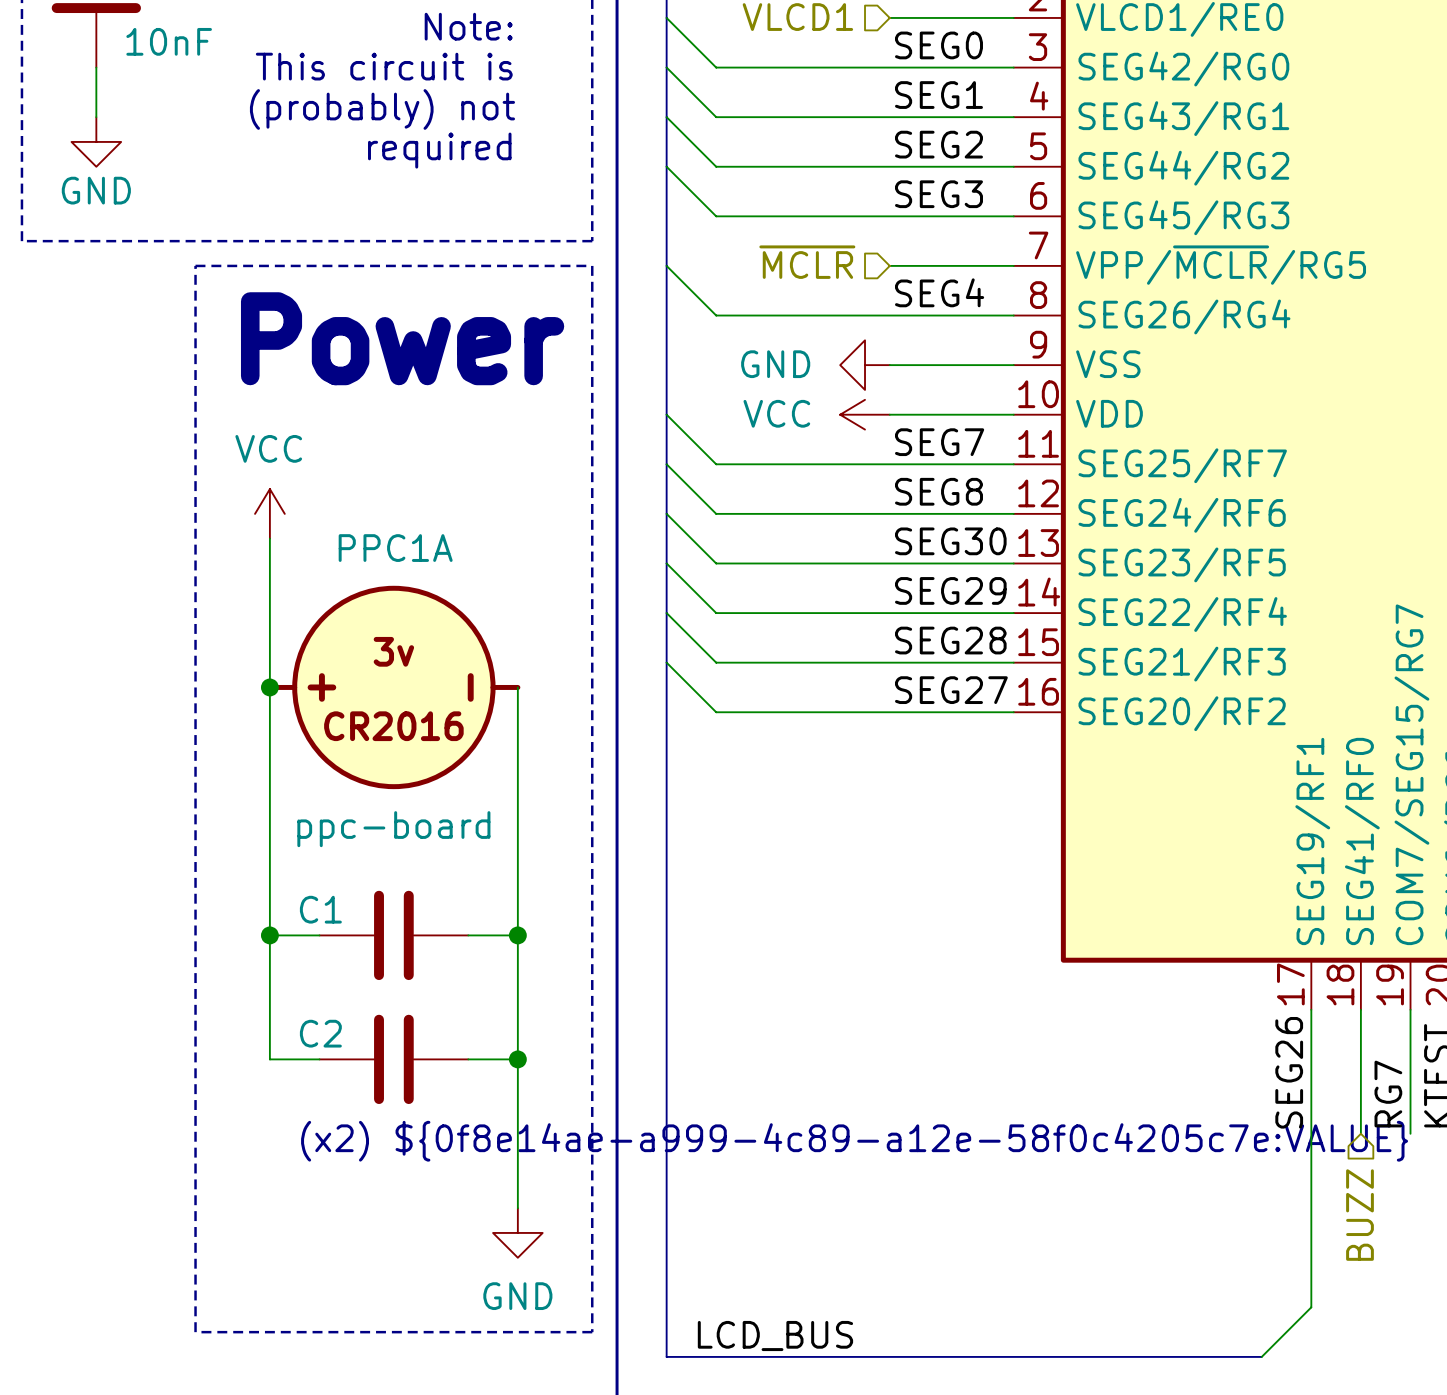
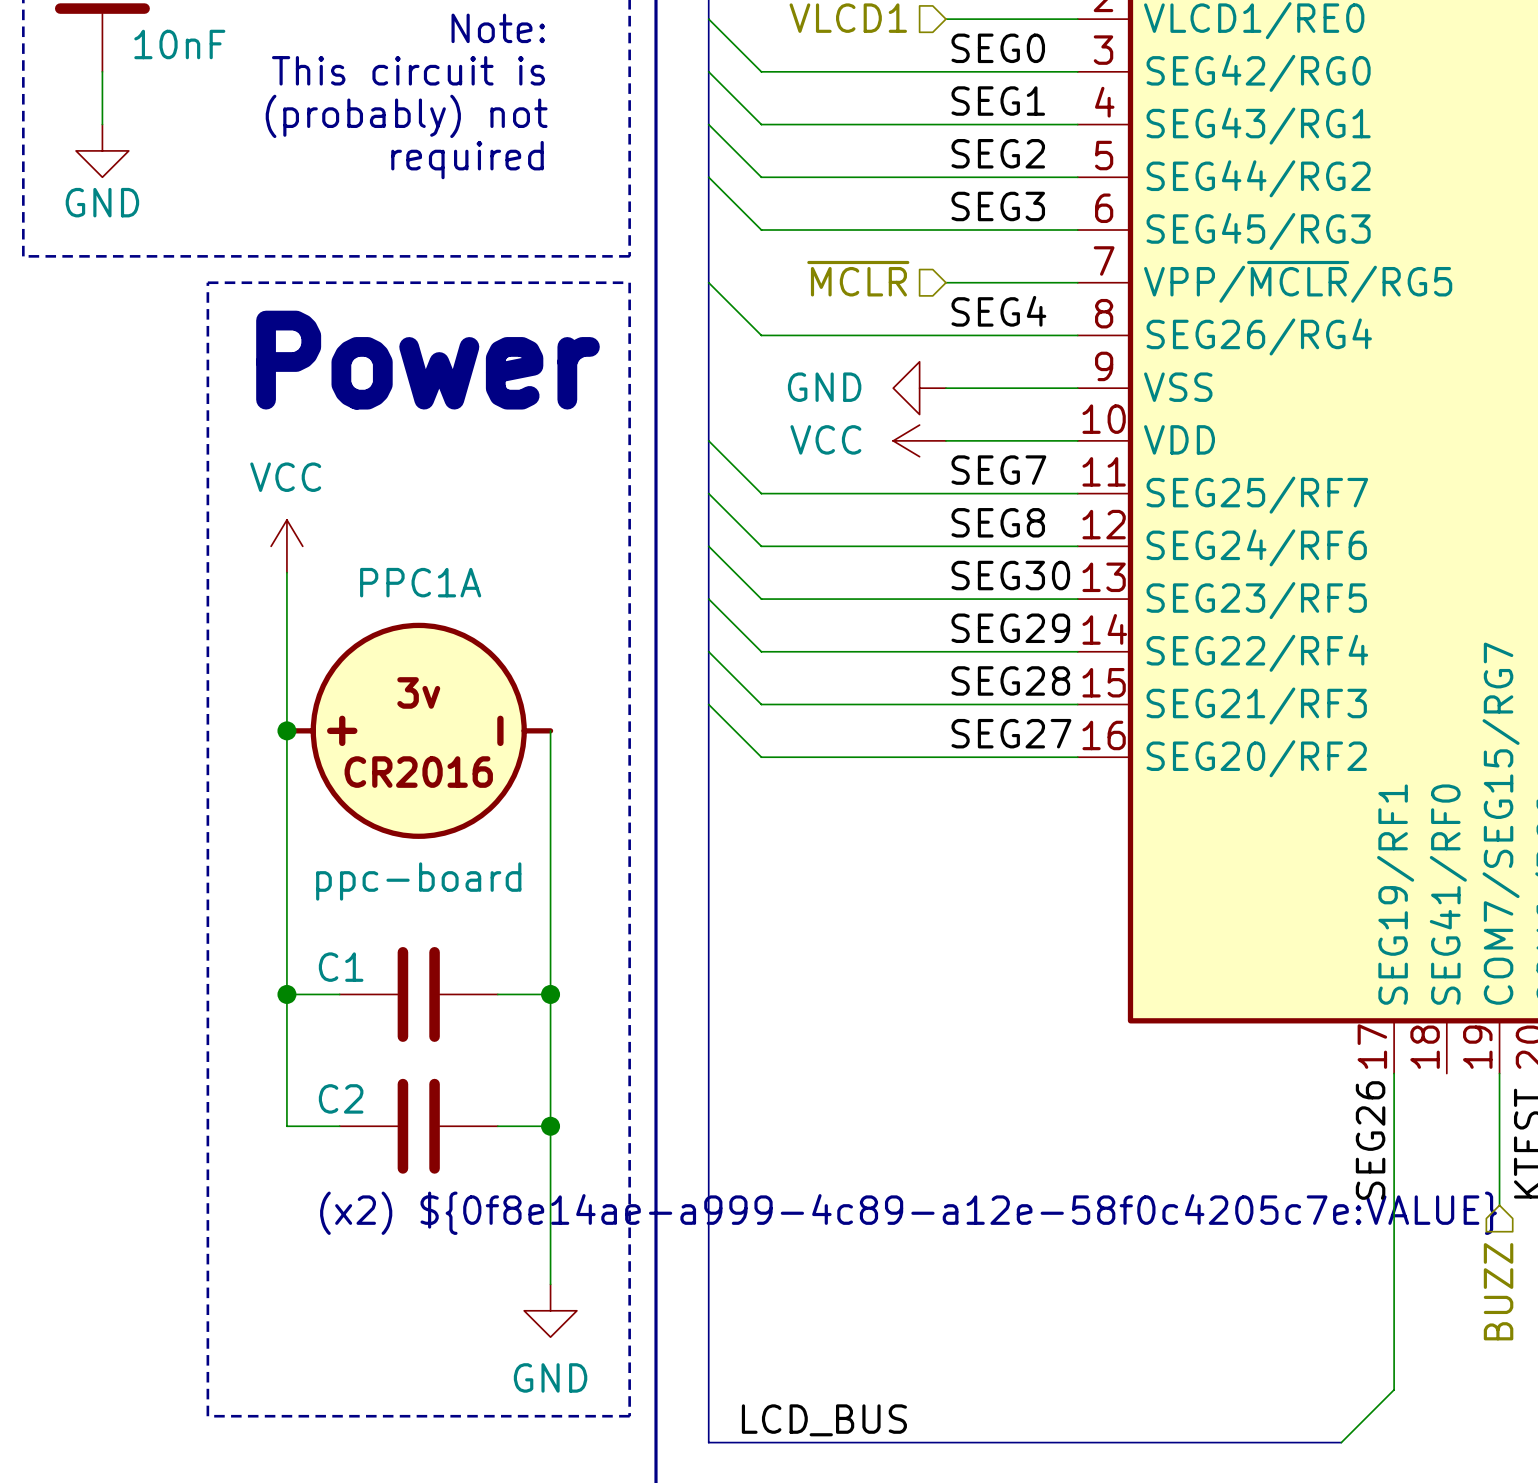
wire: (1360, 1009) (1360, 1133) -> none
label: RG7 (1388, 1094) -> none
hierarchical label position: BUZZ (1359, 1215) -> BUZZ (1498, 1291)

